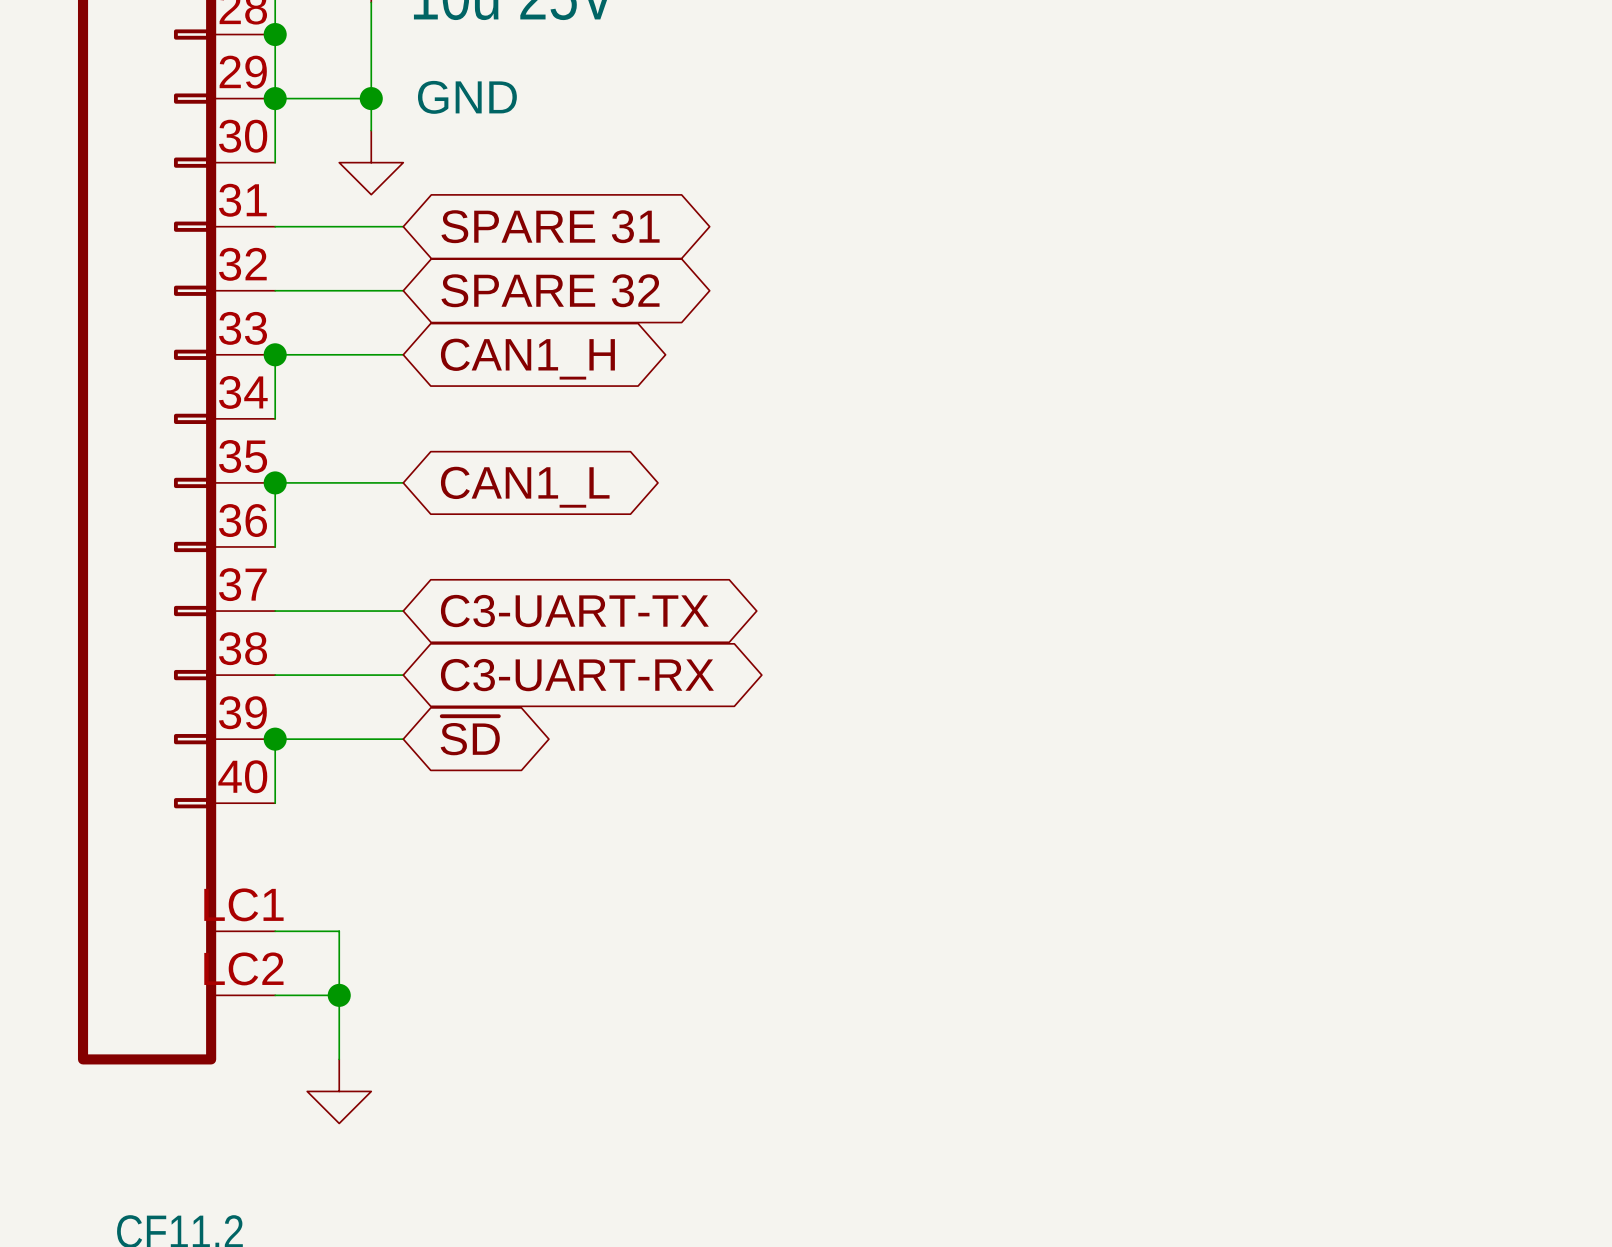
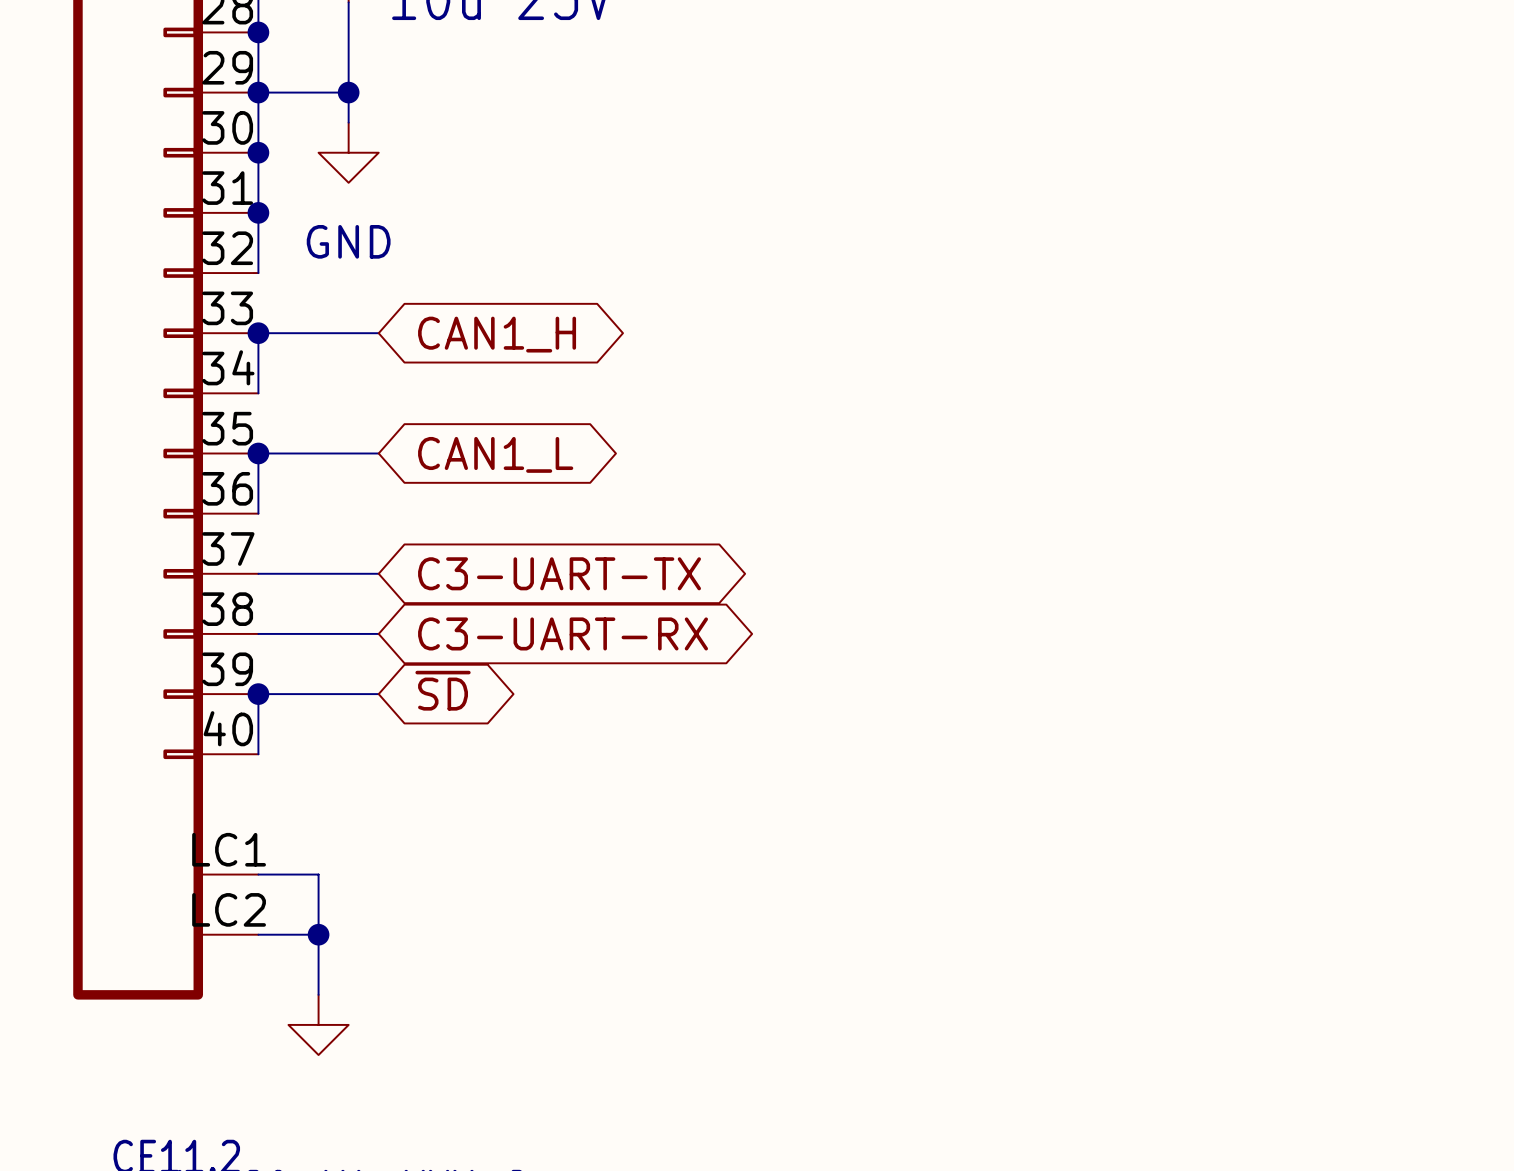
power symbol text position: GND (467, 97) -> GND (348, 241)
junction: none -> (258, 152)
wire: (275, 226) (403, 226) -> none
junction: none -> (258, 212)
global label: SPARE 31 (550, 226) -> none
wire: (275, 290) (403, 290) -> (258, 273) (258, 152)
global label: SPARE 32 (550, 290) -> none

